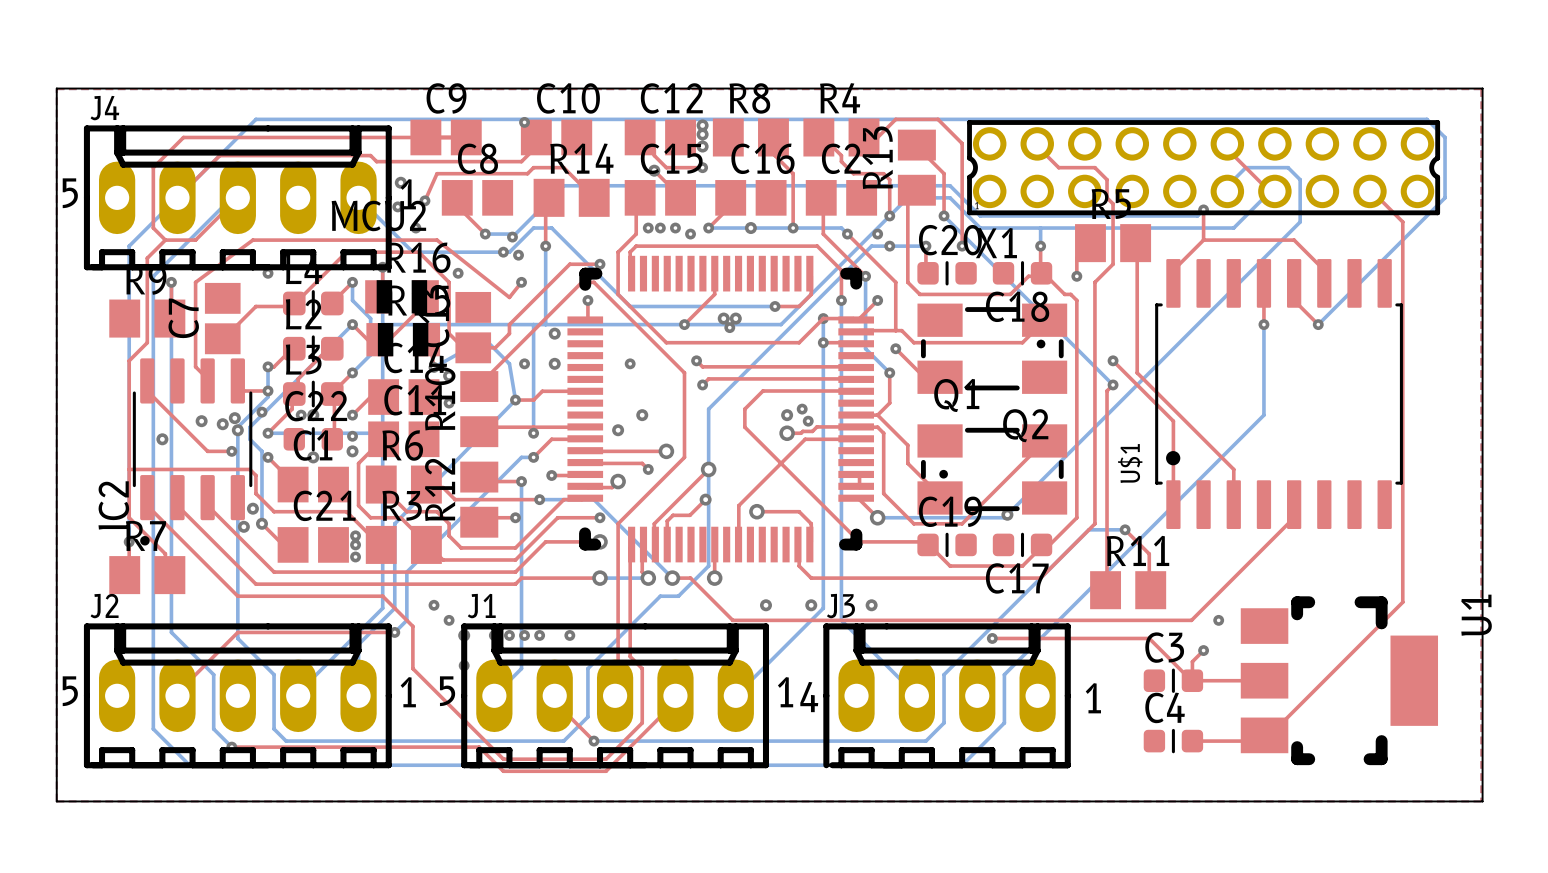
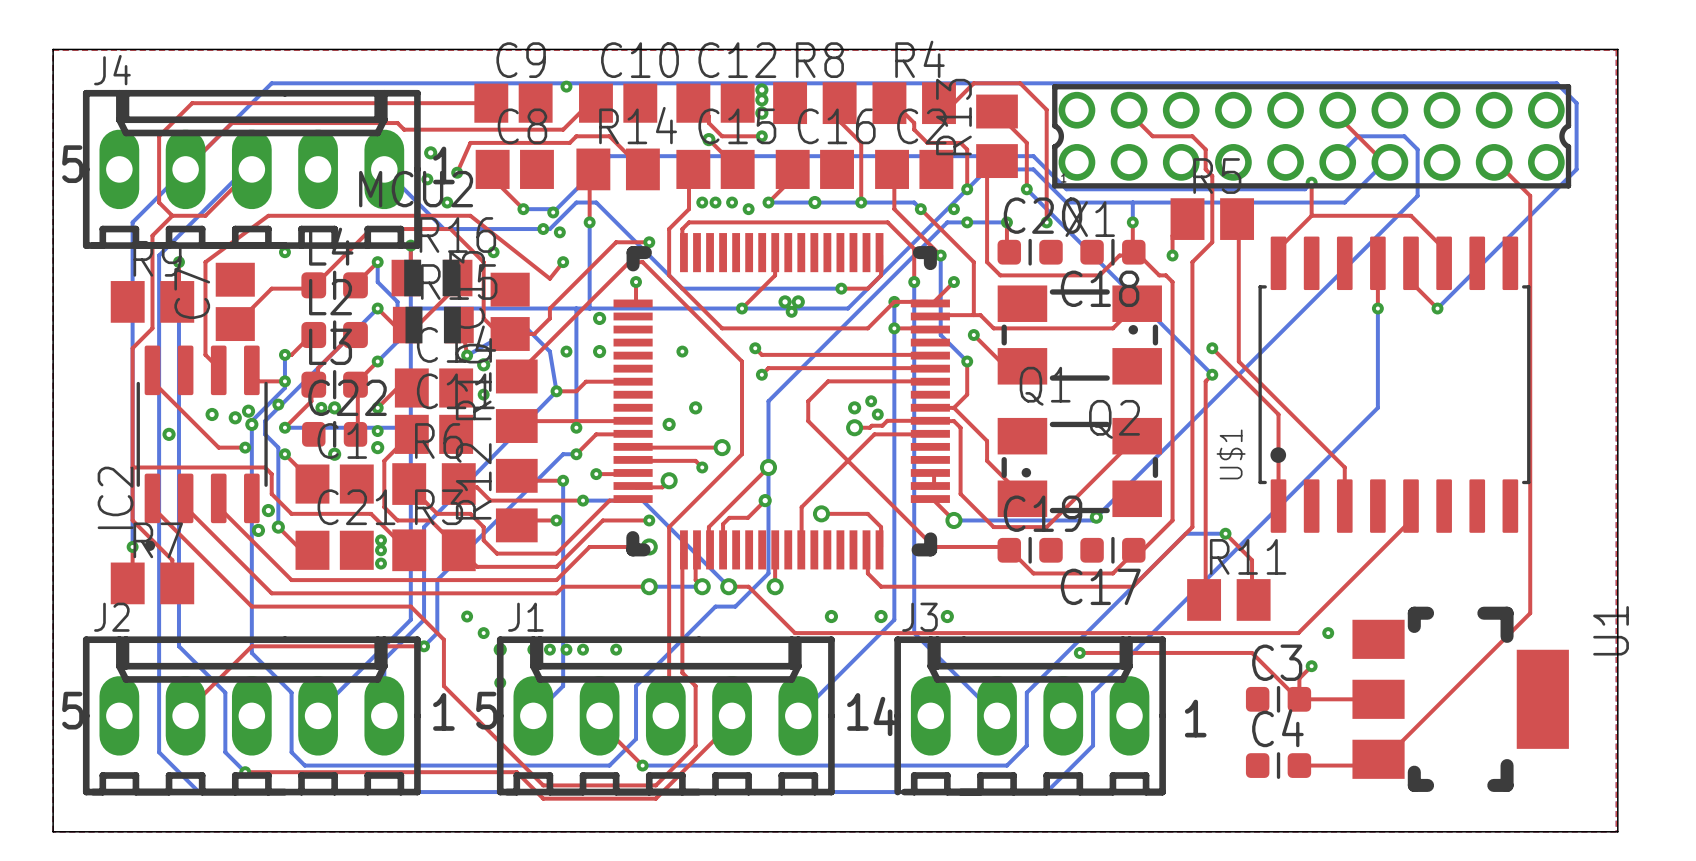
C9 position: (446, 137) -> (513, 103)
C10 position: (556, 137) -> (618, 103)

